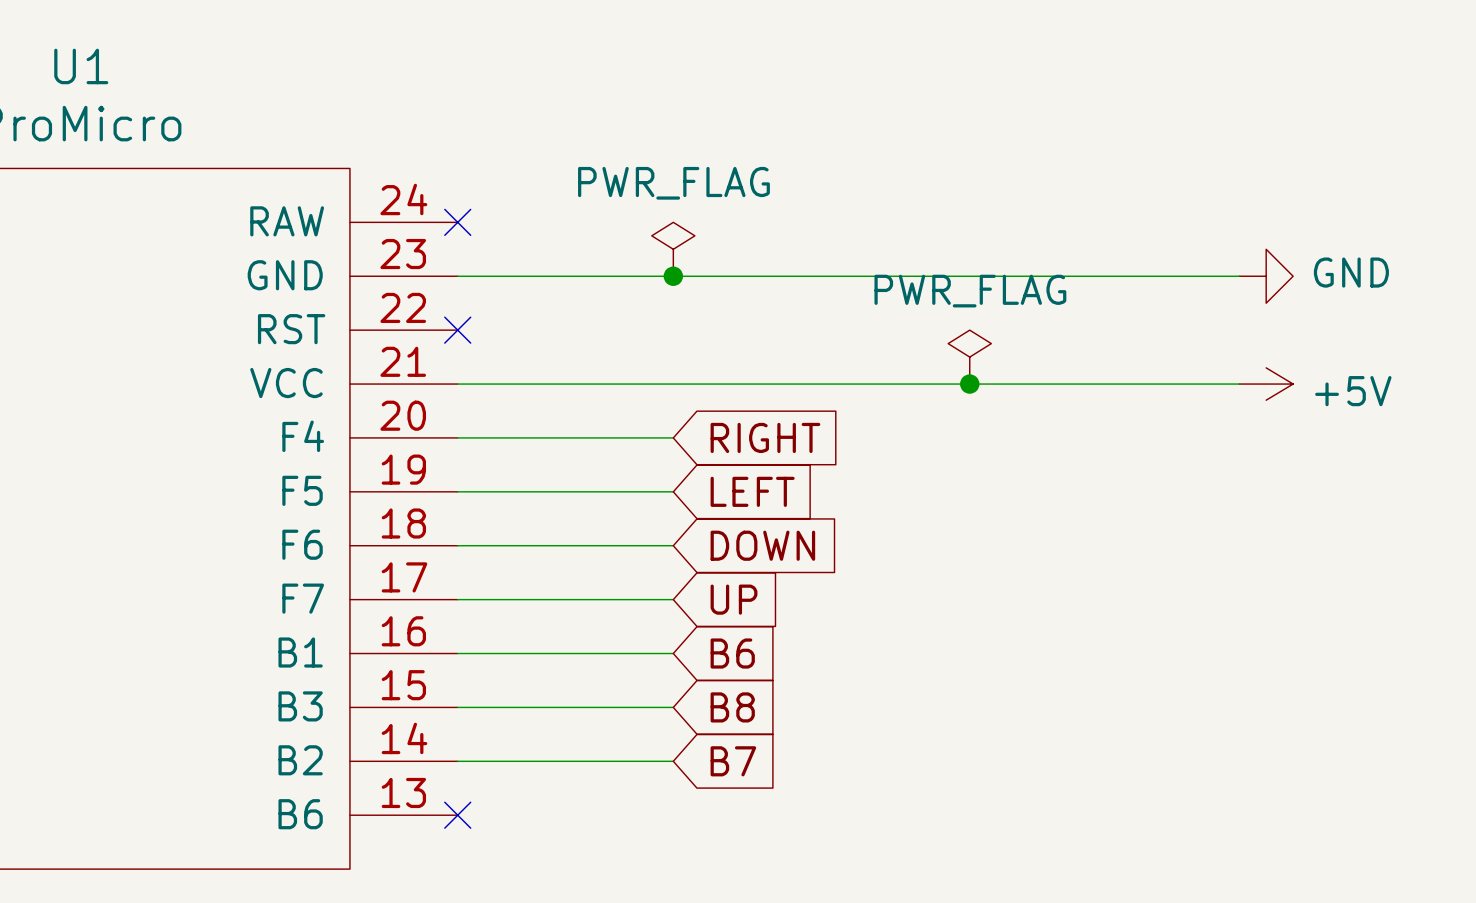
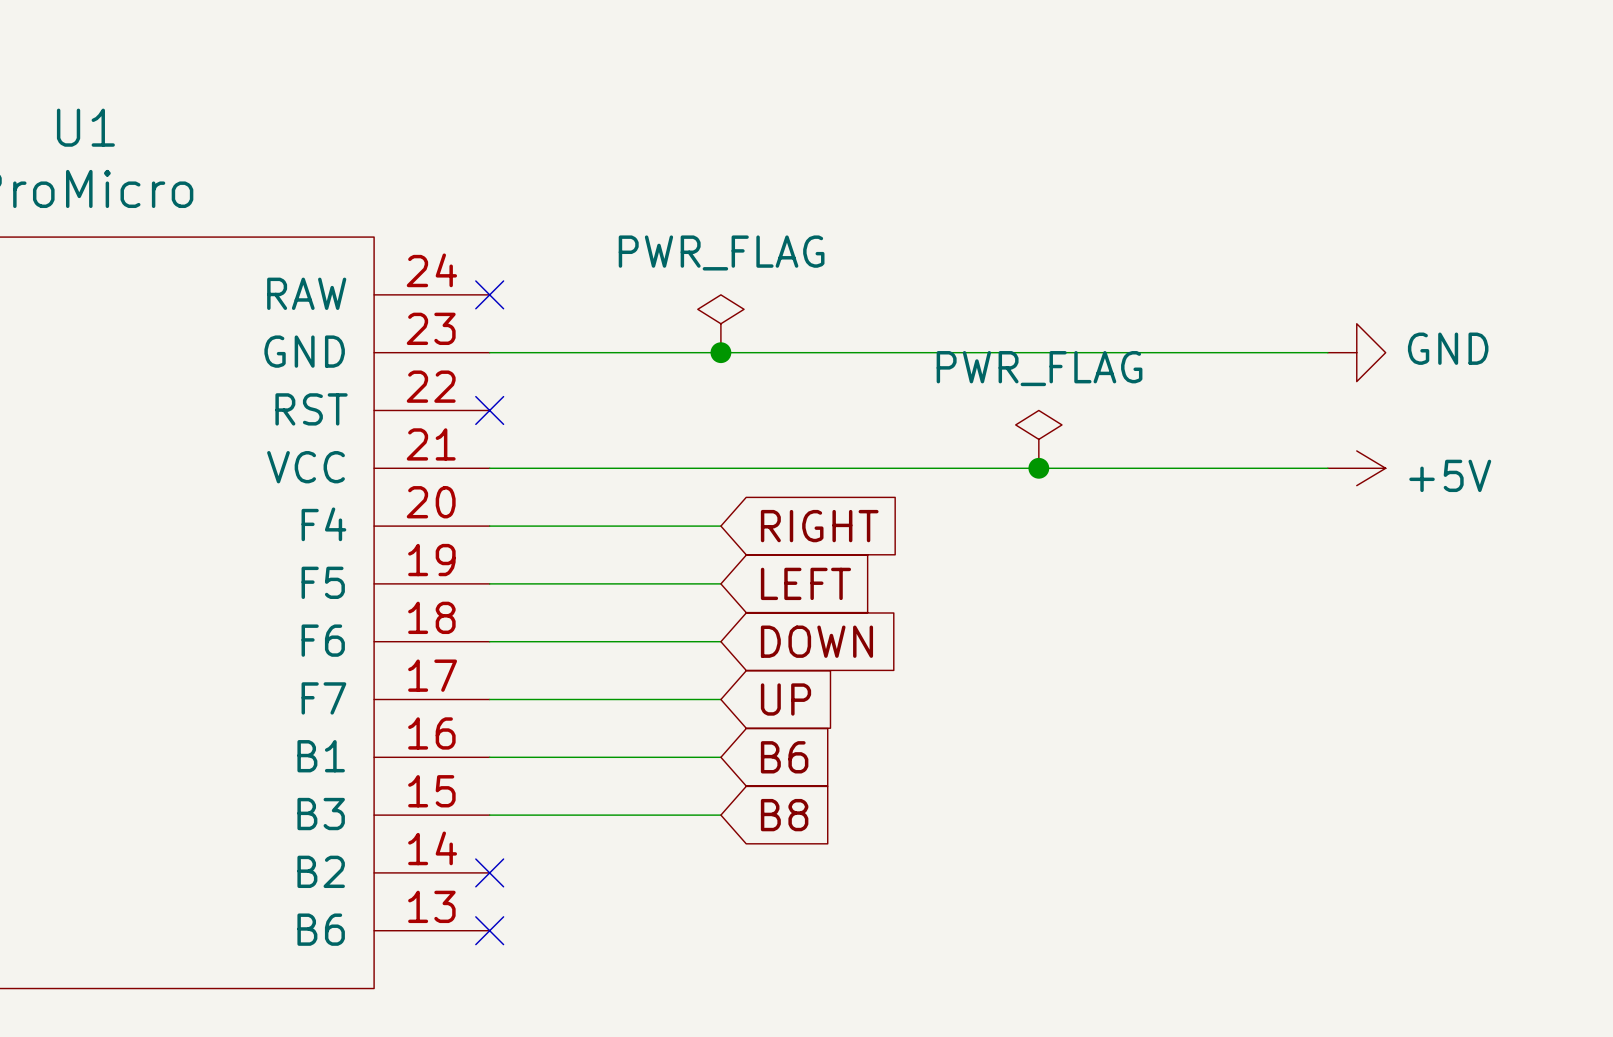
wire: (457, 761) (673, 761) -> none
no-connect mark: none -> (489, 872)
global label: B7 (733, 761) -> none

